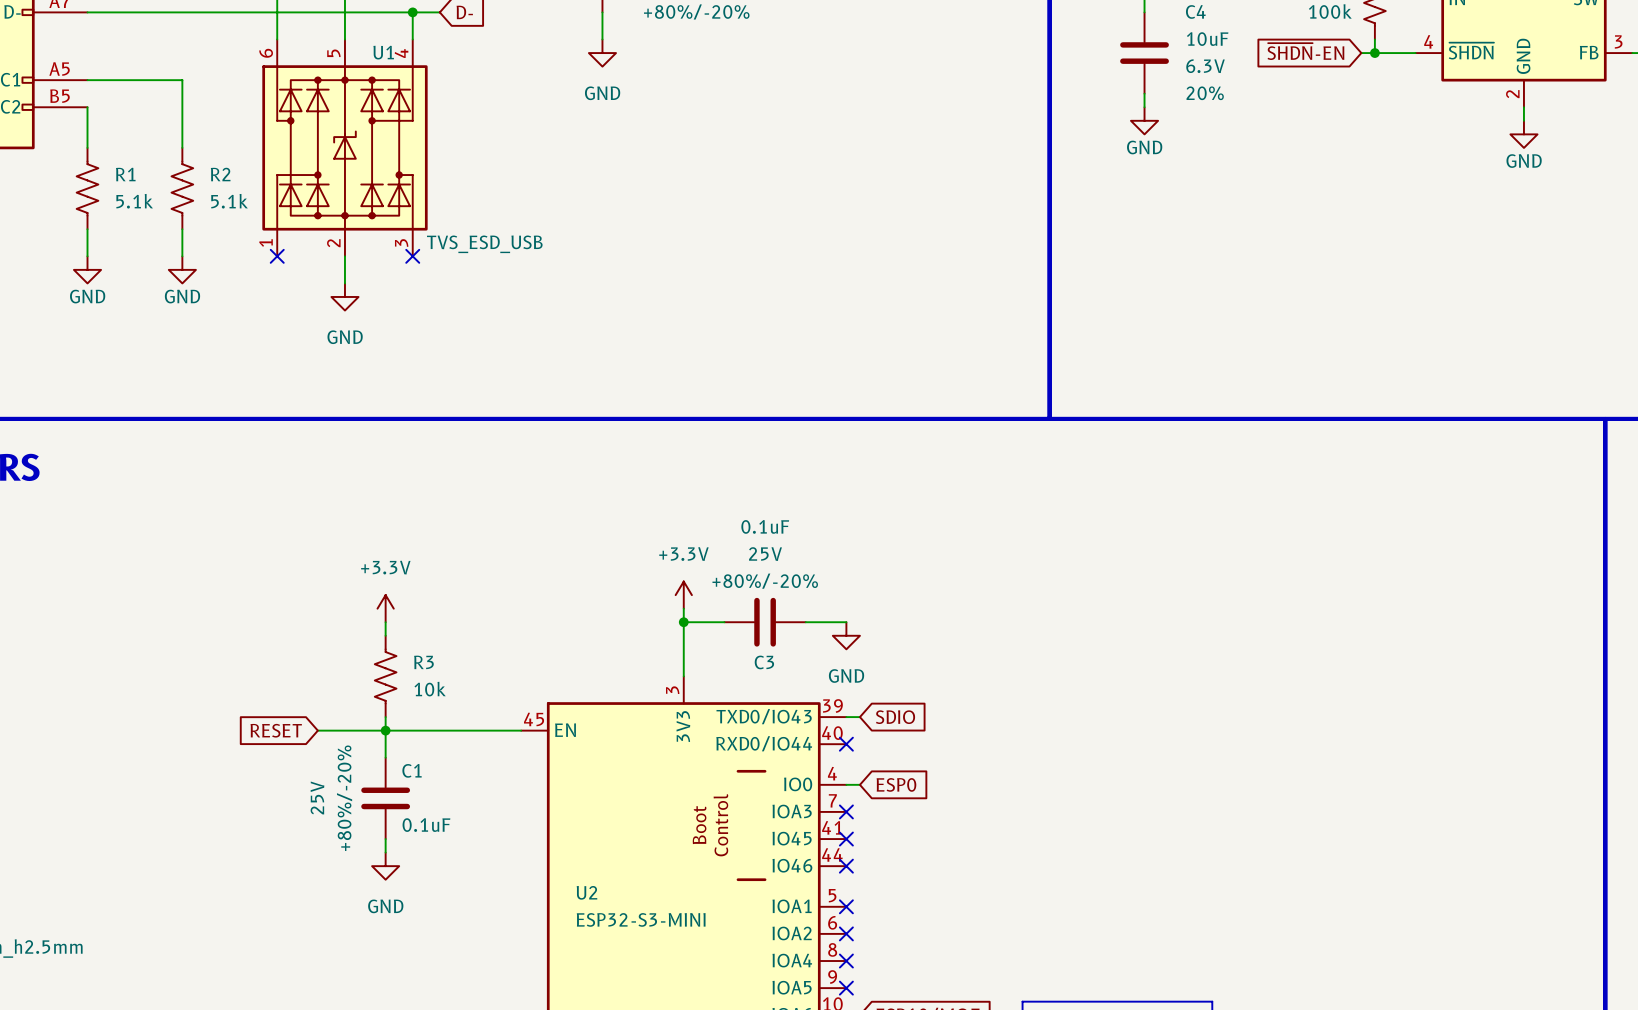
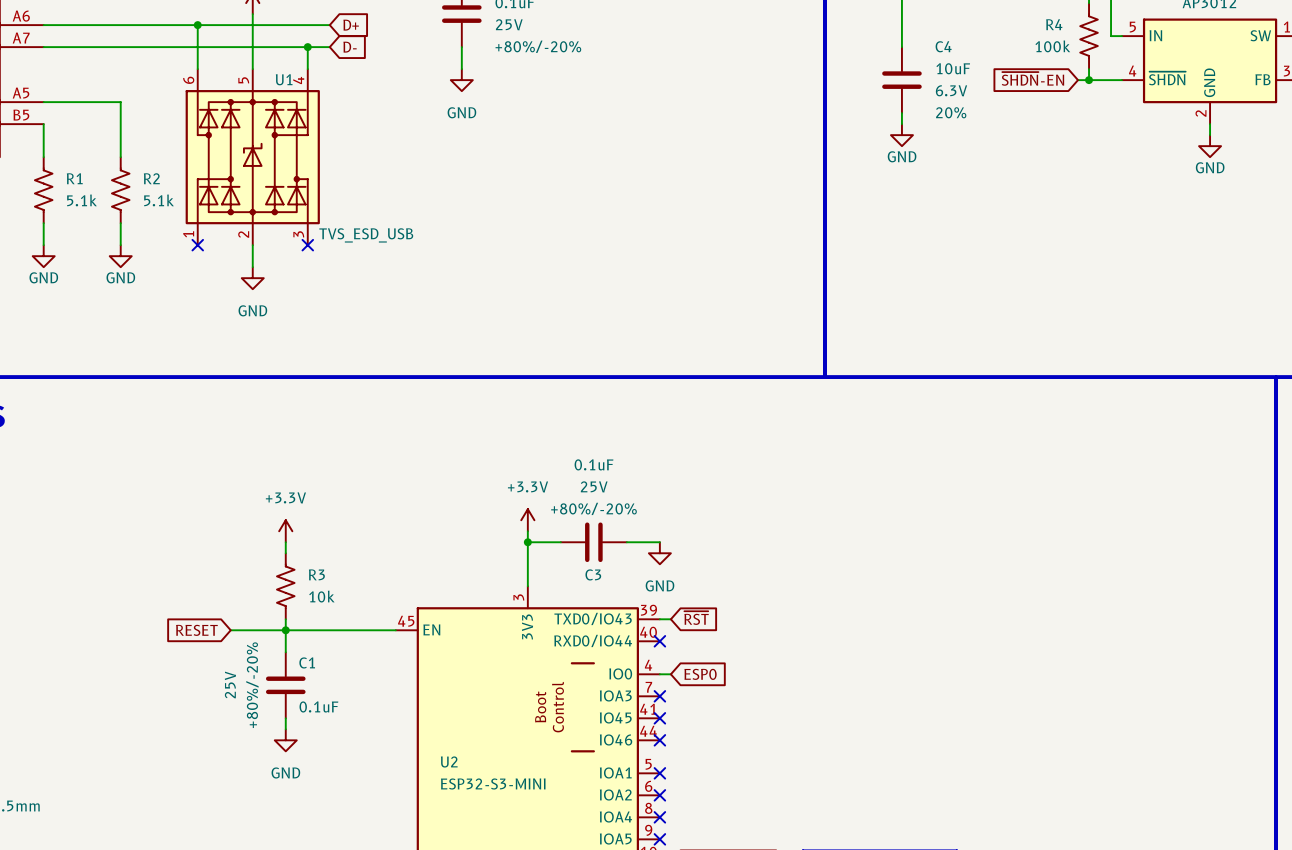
global label: SDIO (895, 717) -> ~{RST} (696, 618)

